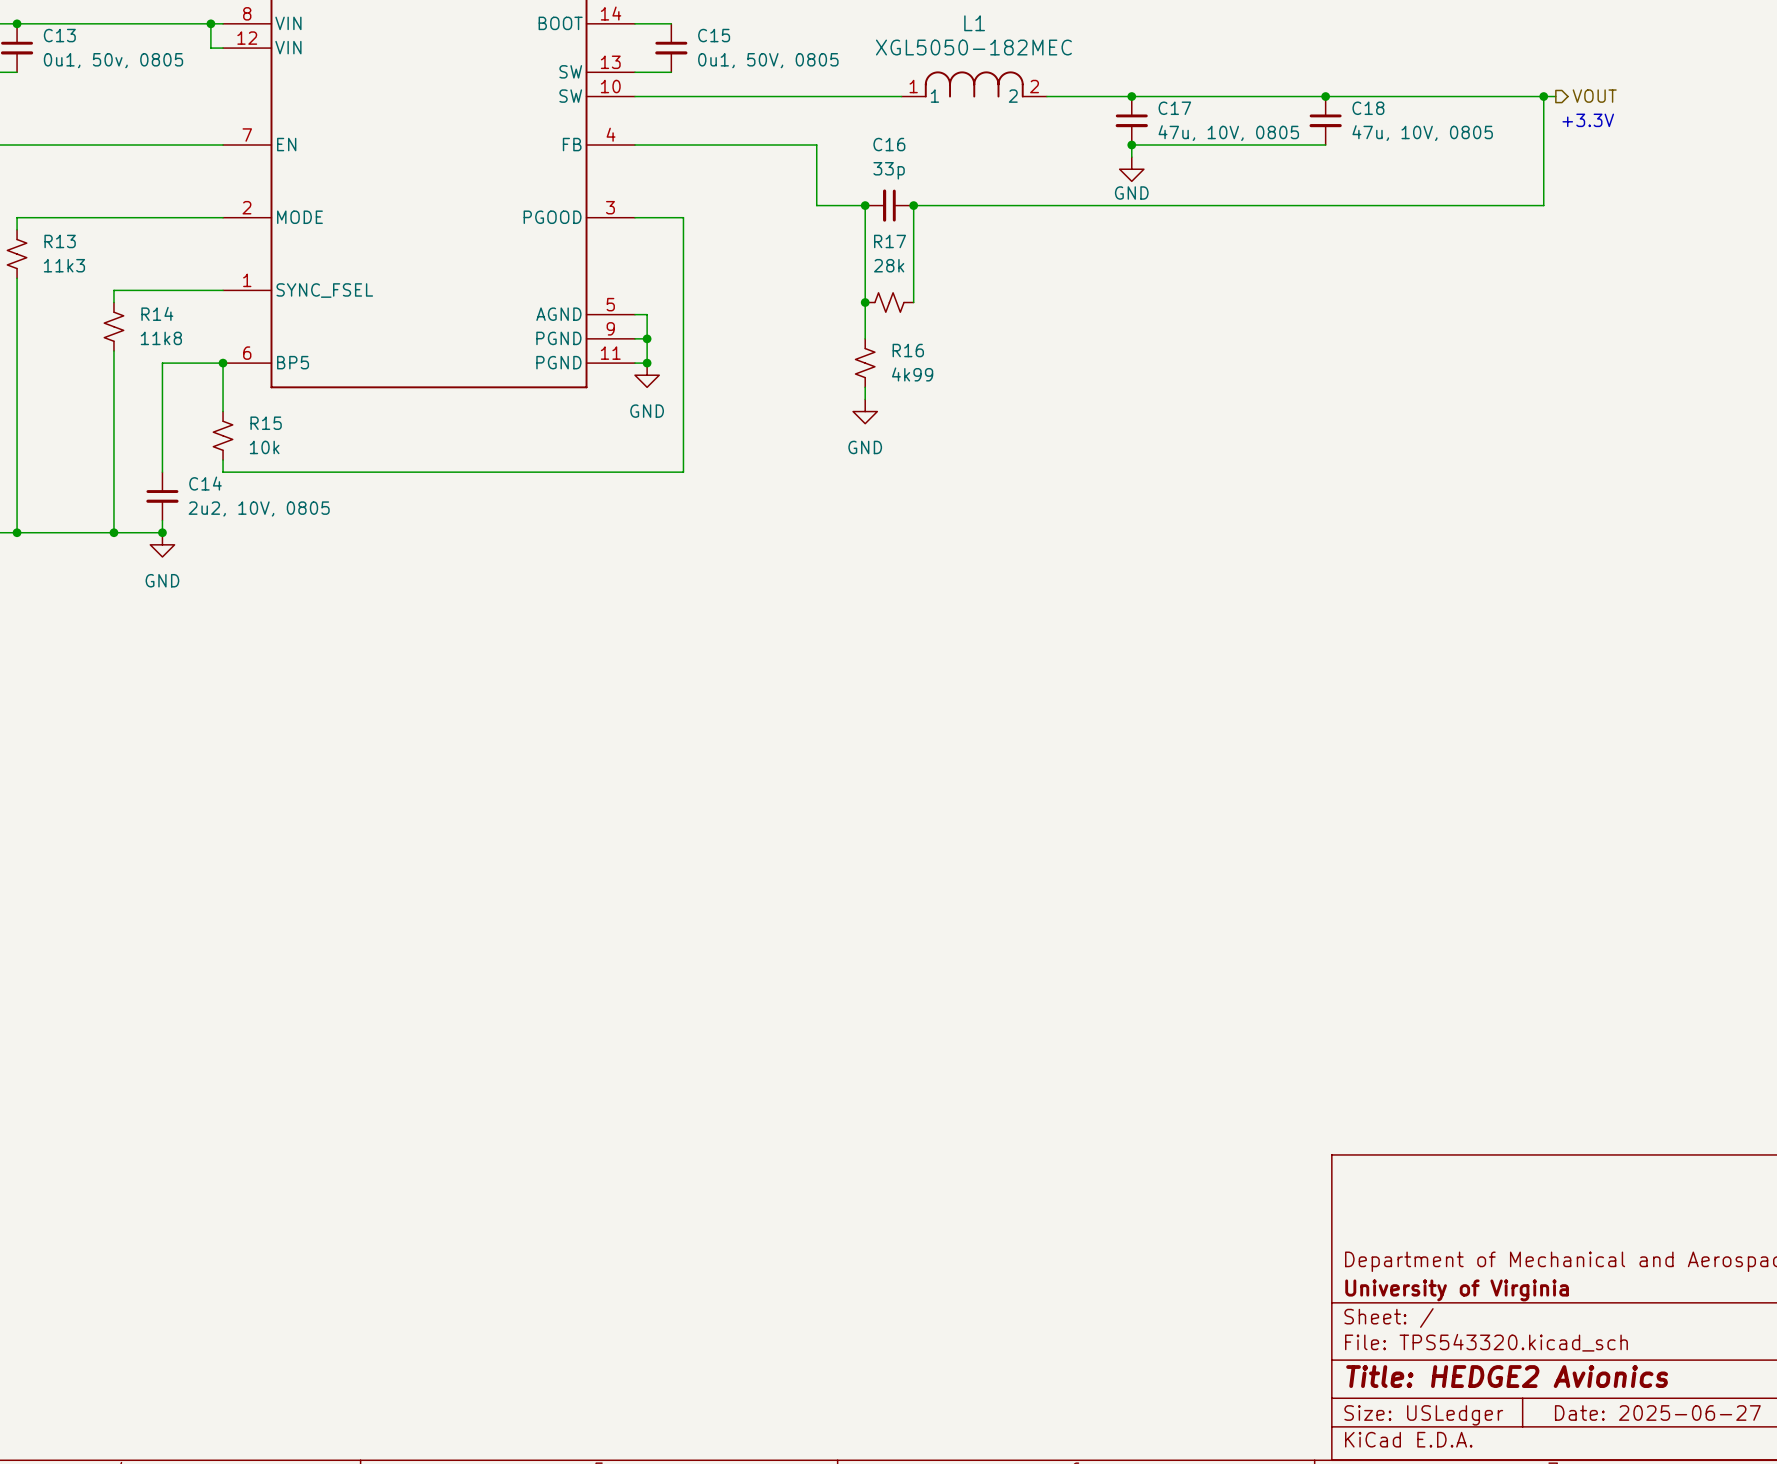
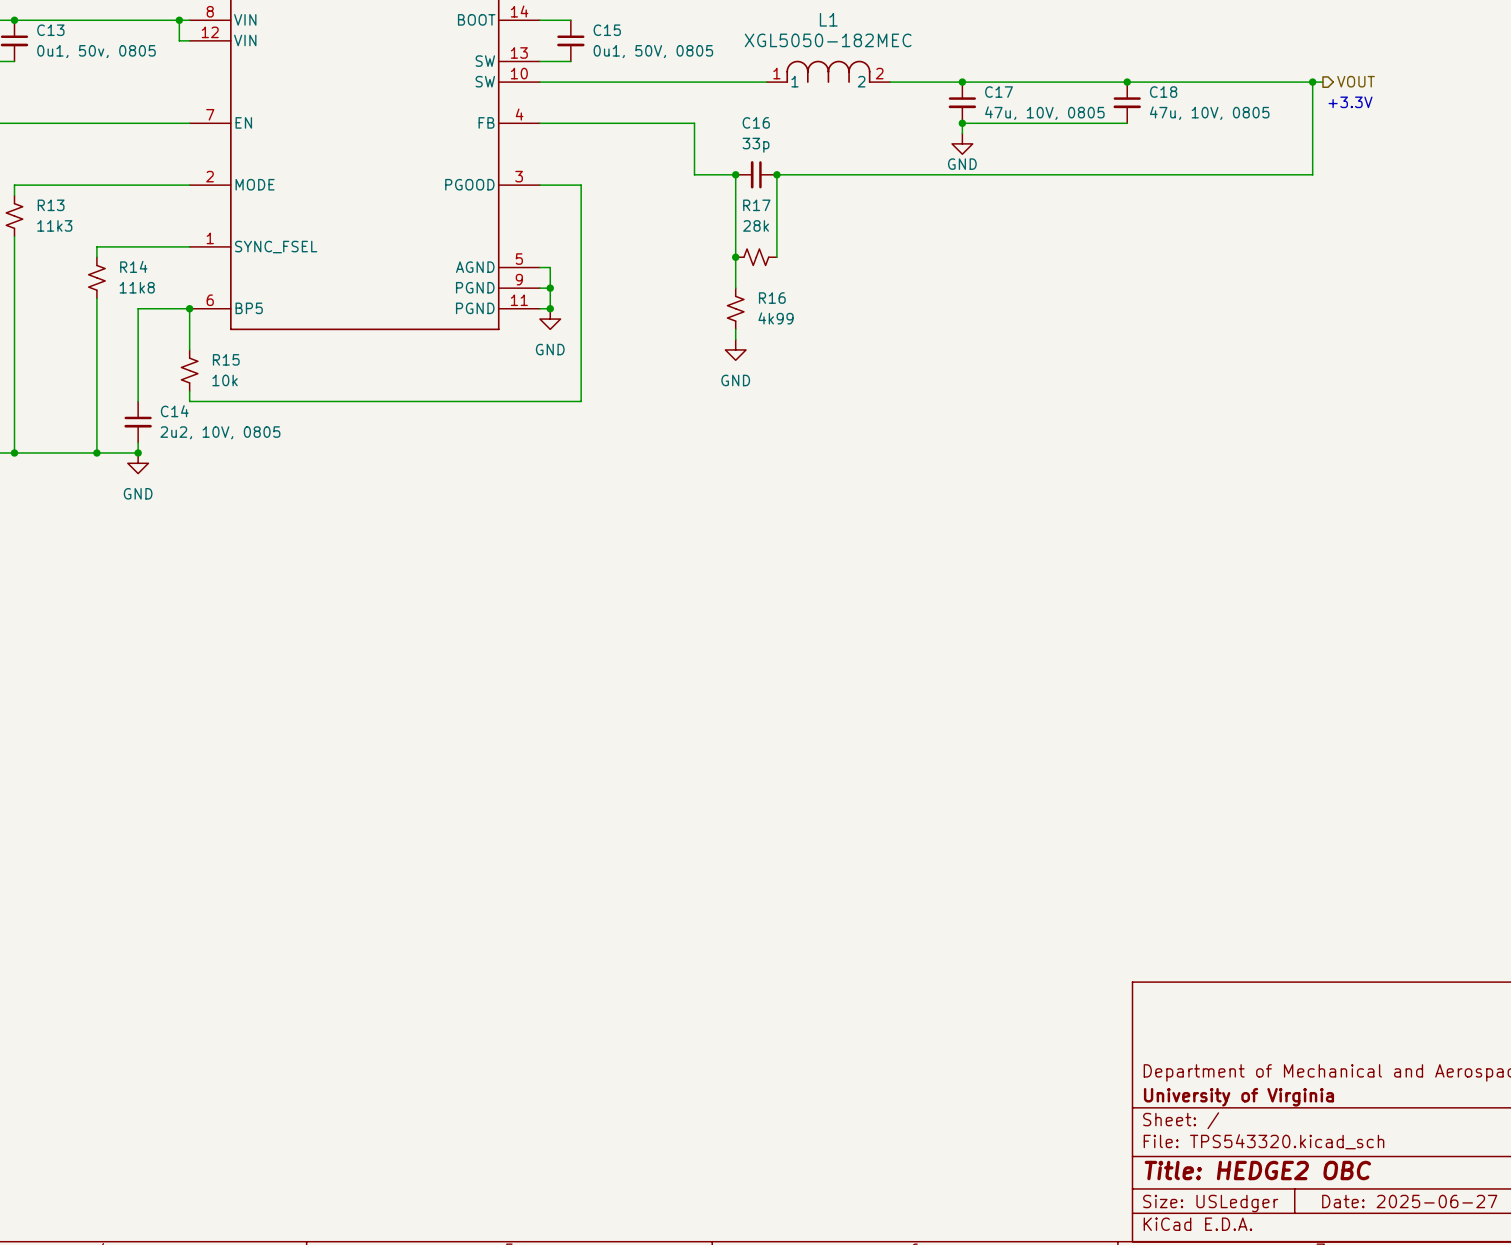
title block: Title: HEDGE2 Avionics (1507, 1376) -> Title: HEDGE2 OBC (1257, 1170)

